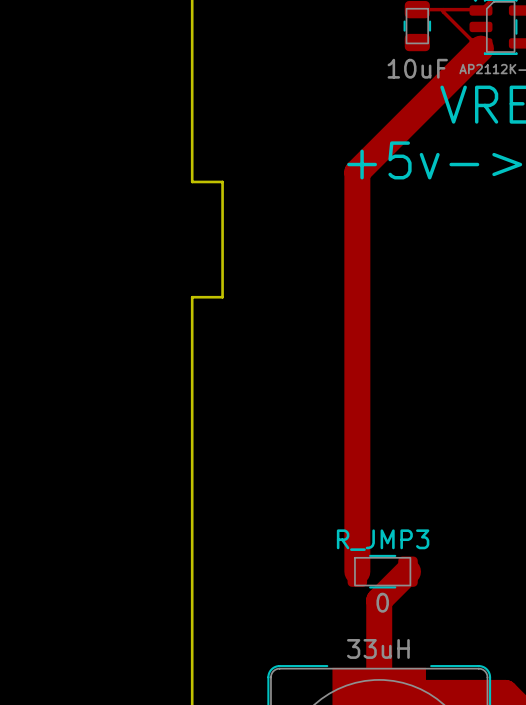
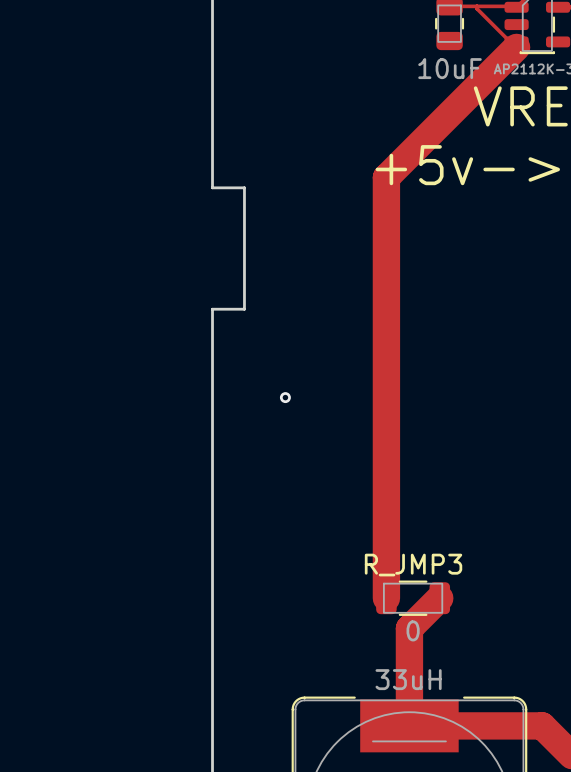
via: none -> (285, 397)

